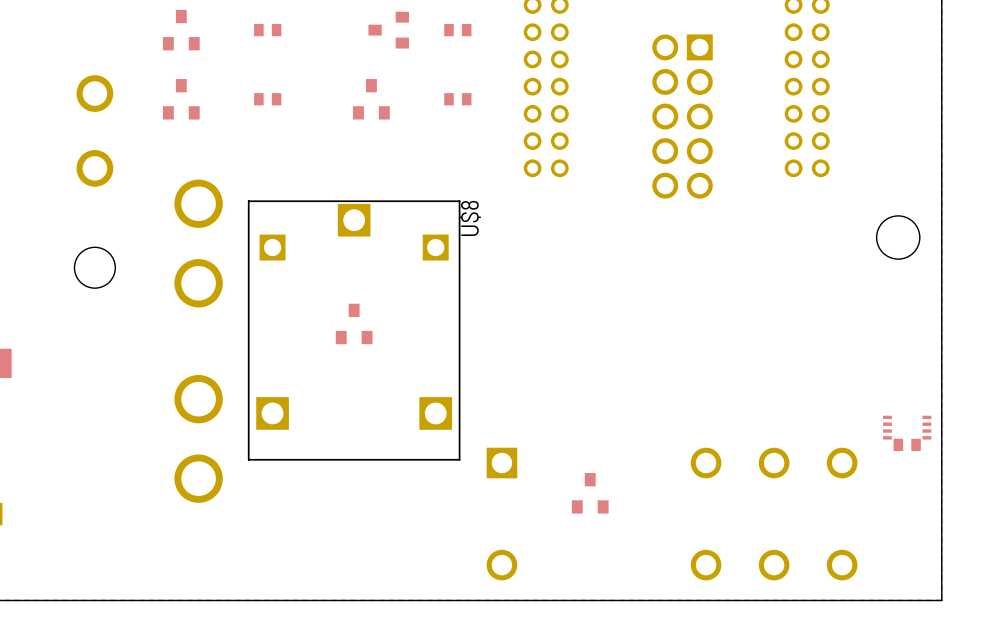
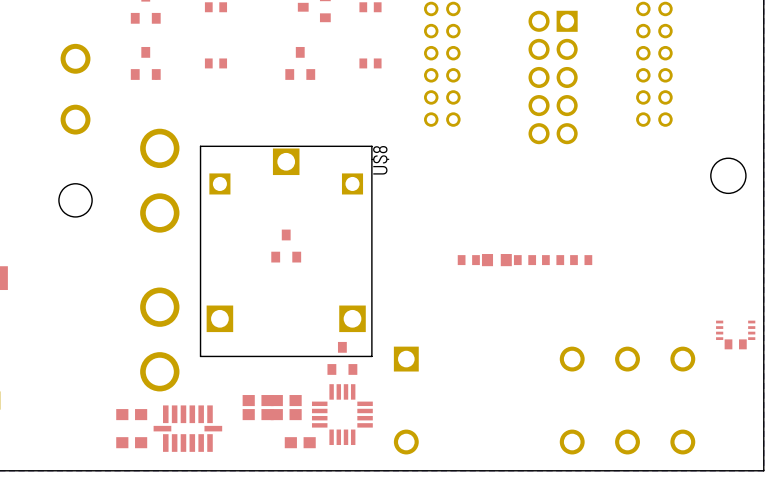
part: none -> (468, 260)
part: none -> (496, 260)
part: none -> (524, 260)
part: none -> (553, 260)
part: none -> (581, 260)
part position: (590, 493) -> (342, 358)
part: none -> (258, 400)
part: none -> (286, 400)
part: none -> (131, 414)
part: none -> (258, 414)
part: none -> (286, 414)
part: none -> (342, 414)
part: none -> (187, 428)
part: none -> (131, 442)
part: none -> (300, 442)

